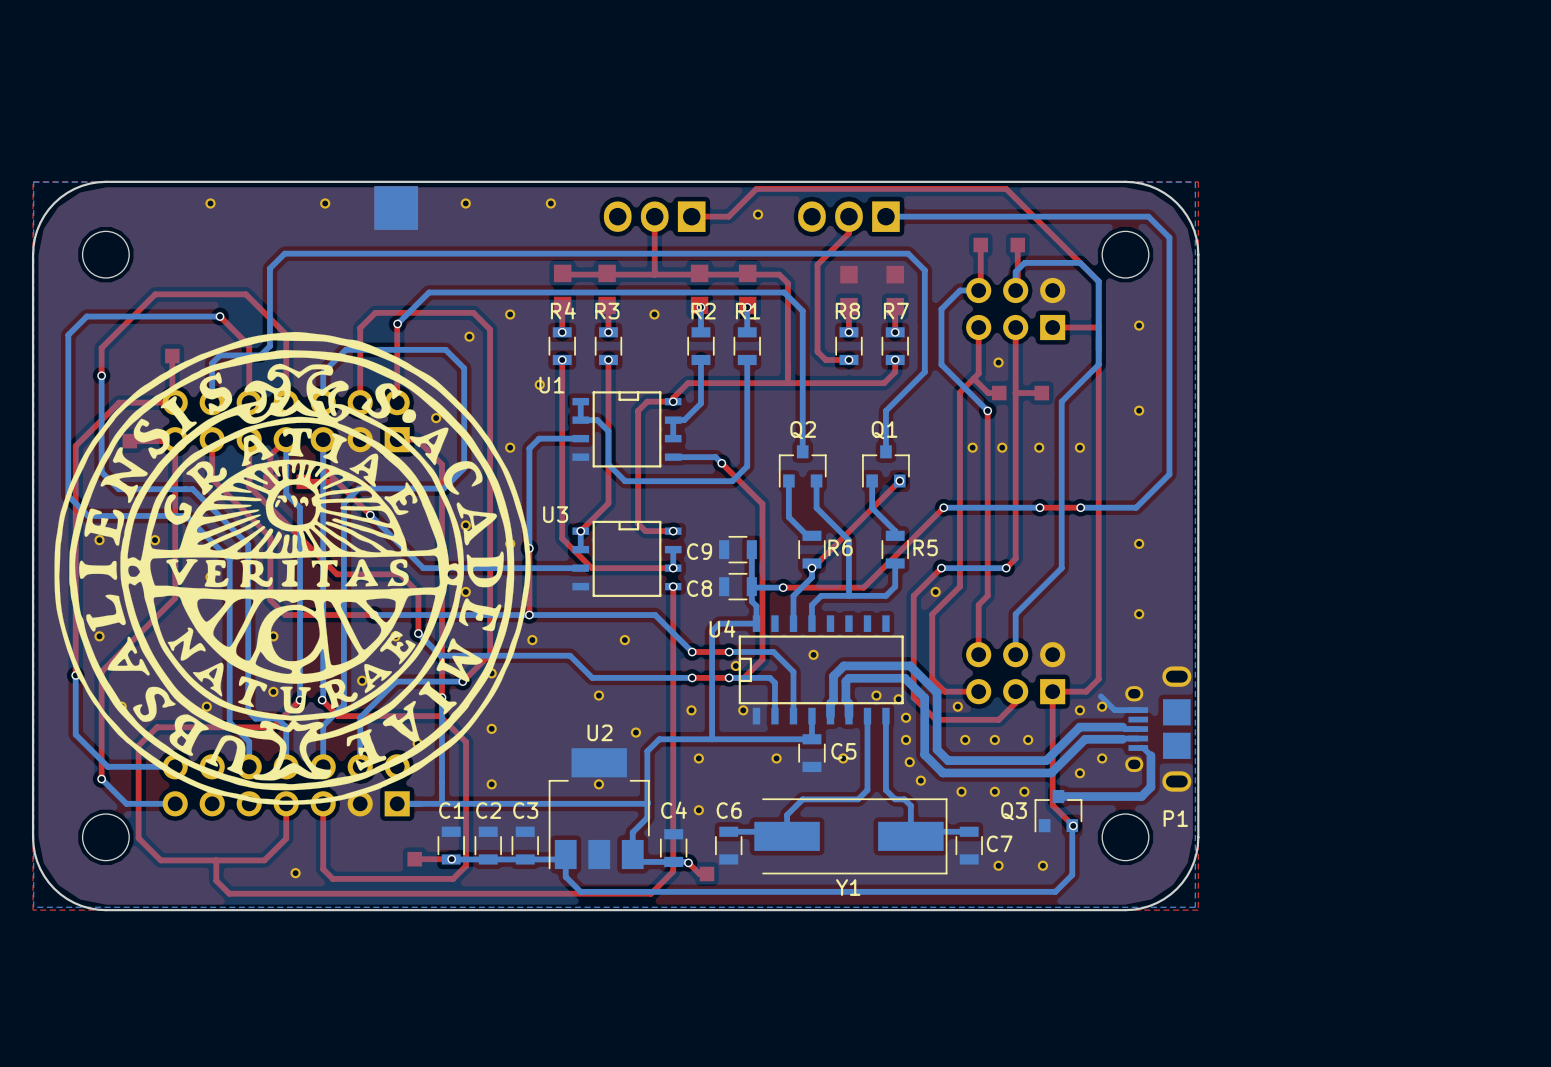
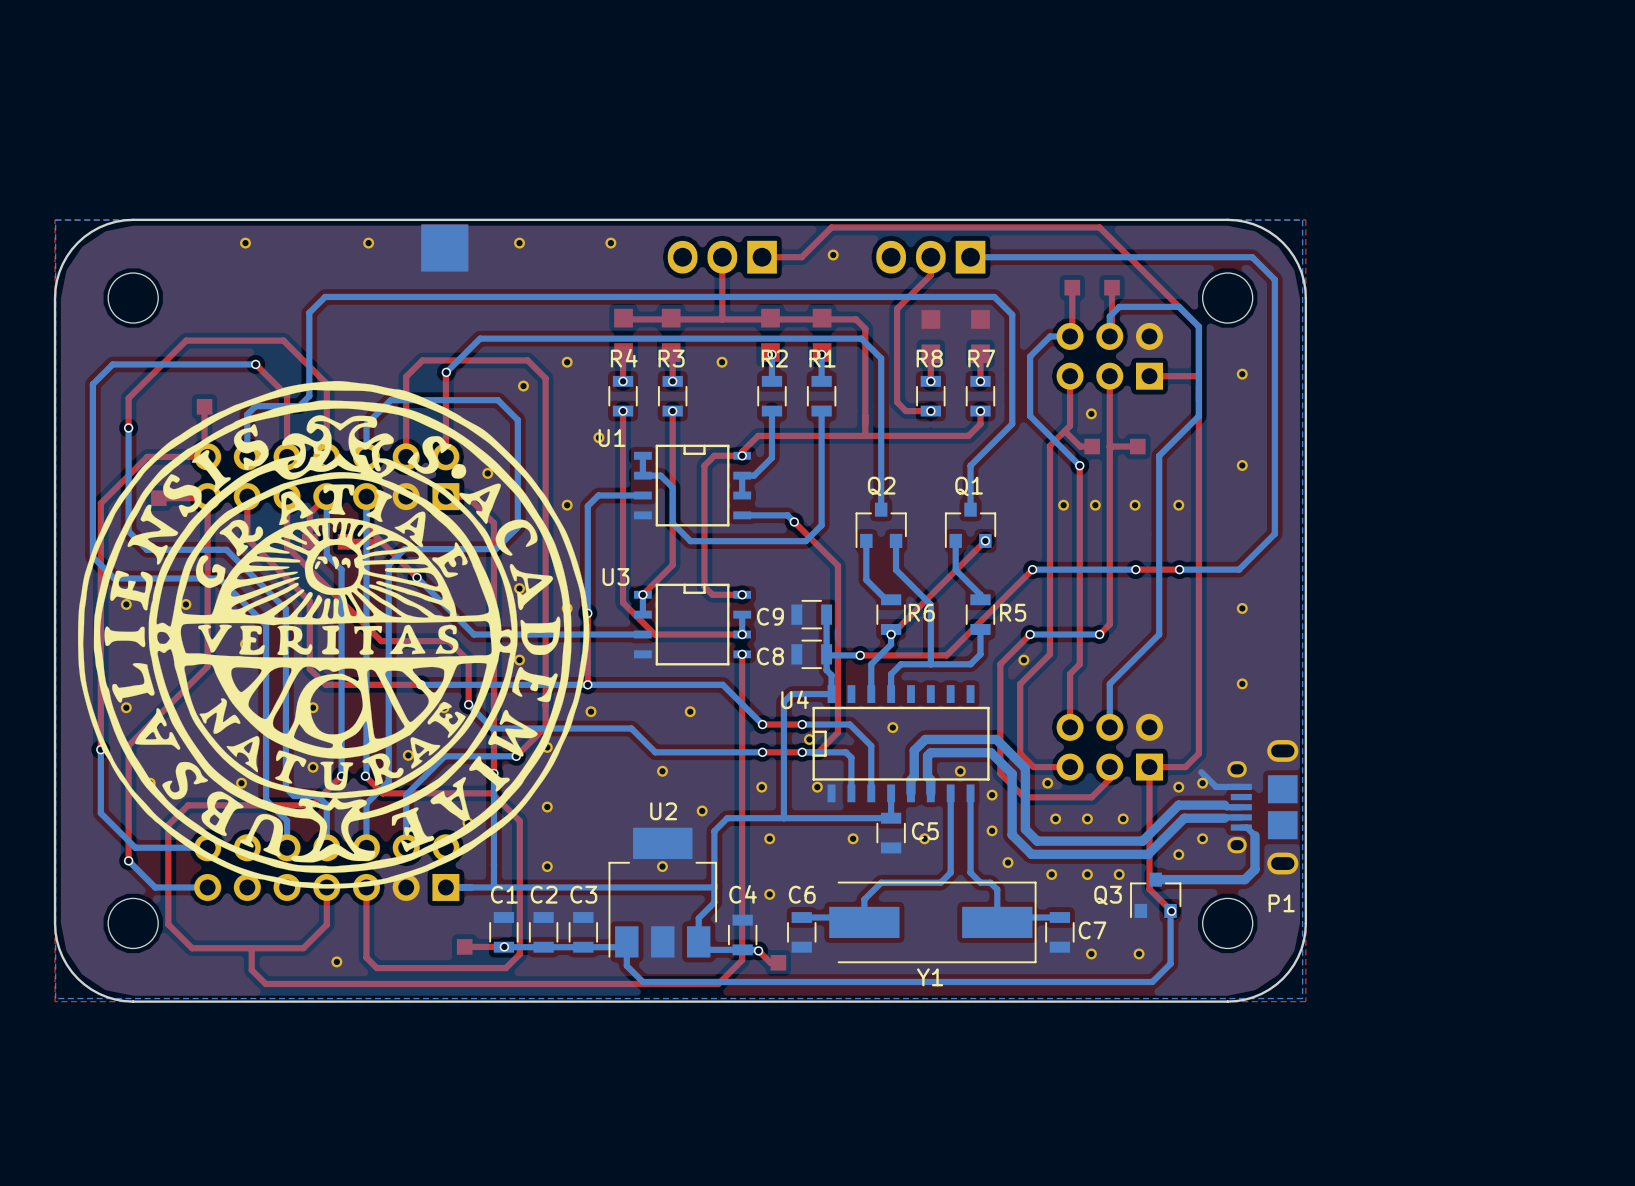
part: (898, 699) -> none
part: (906, 739) -> none
part: none -> (992, 830)
part: (909, 762) -> none

